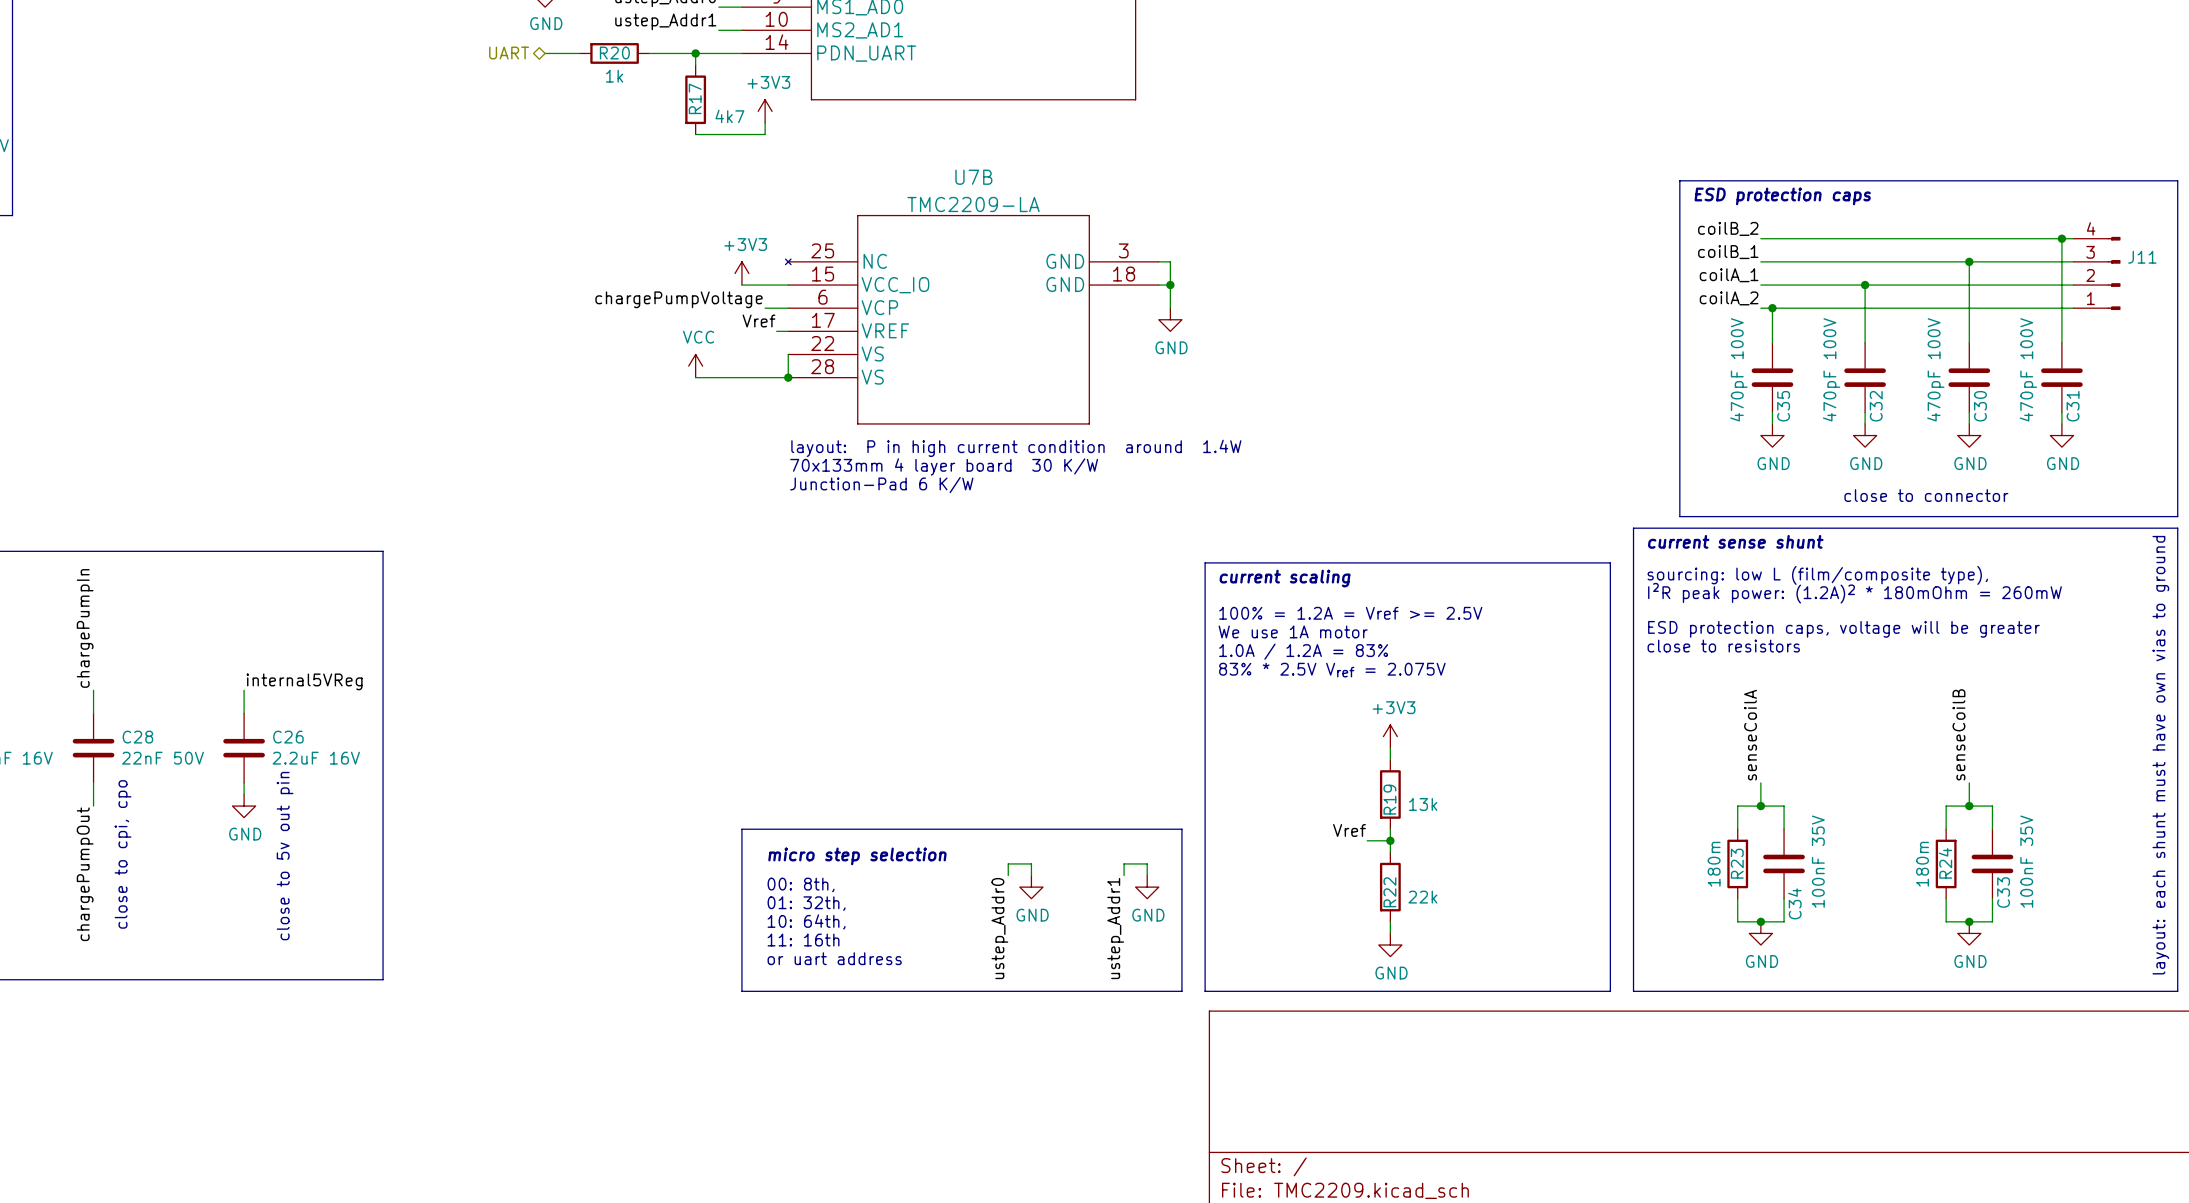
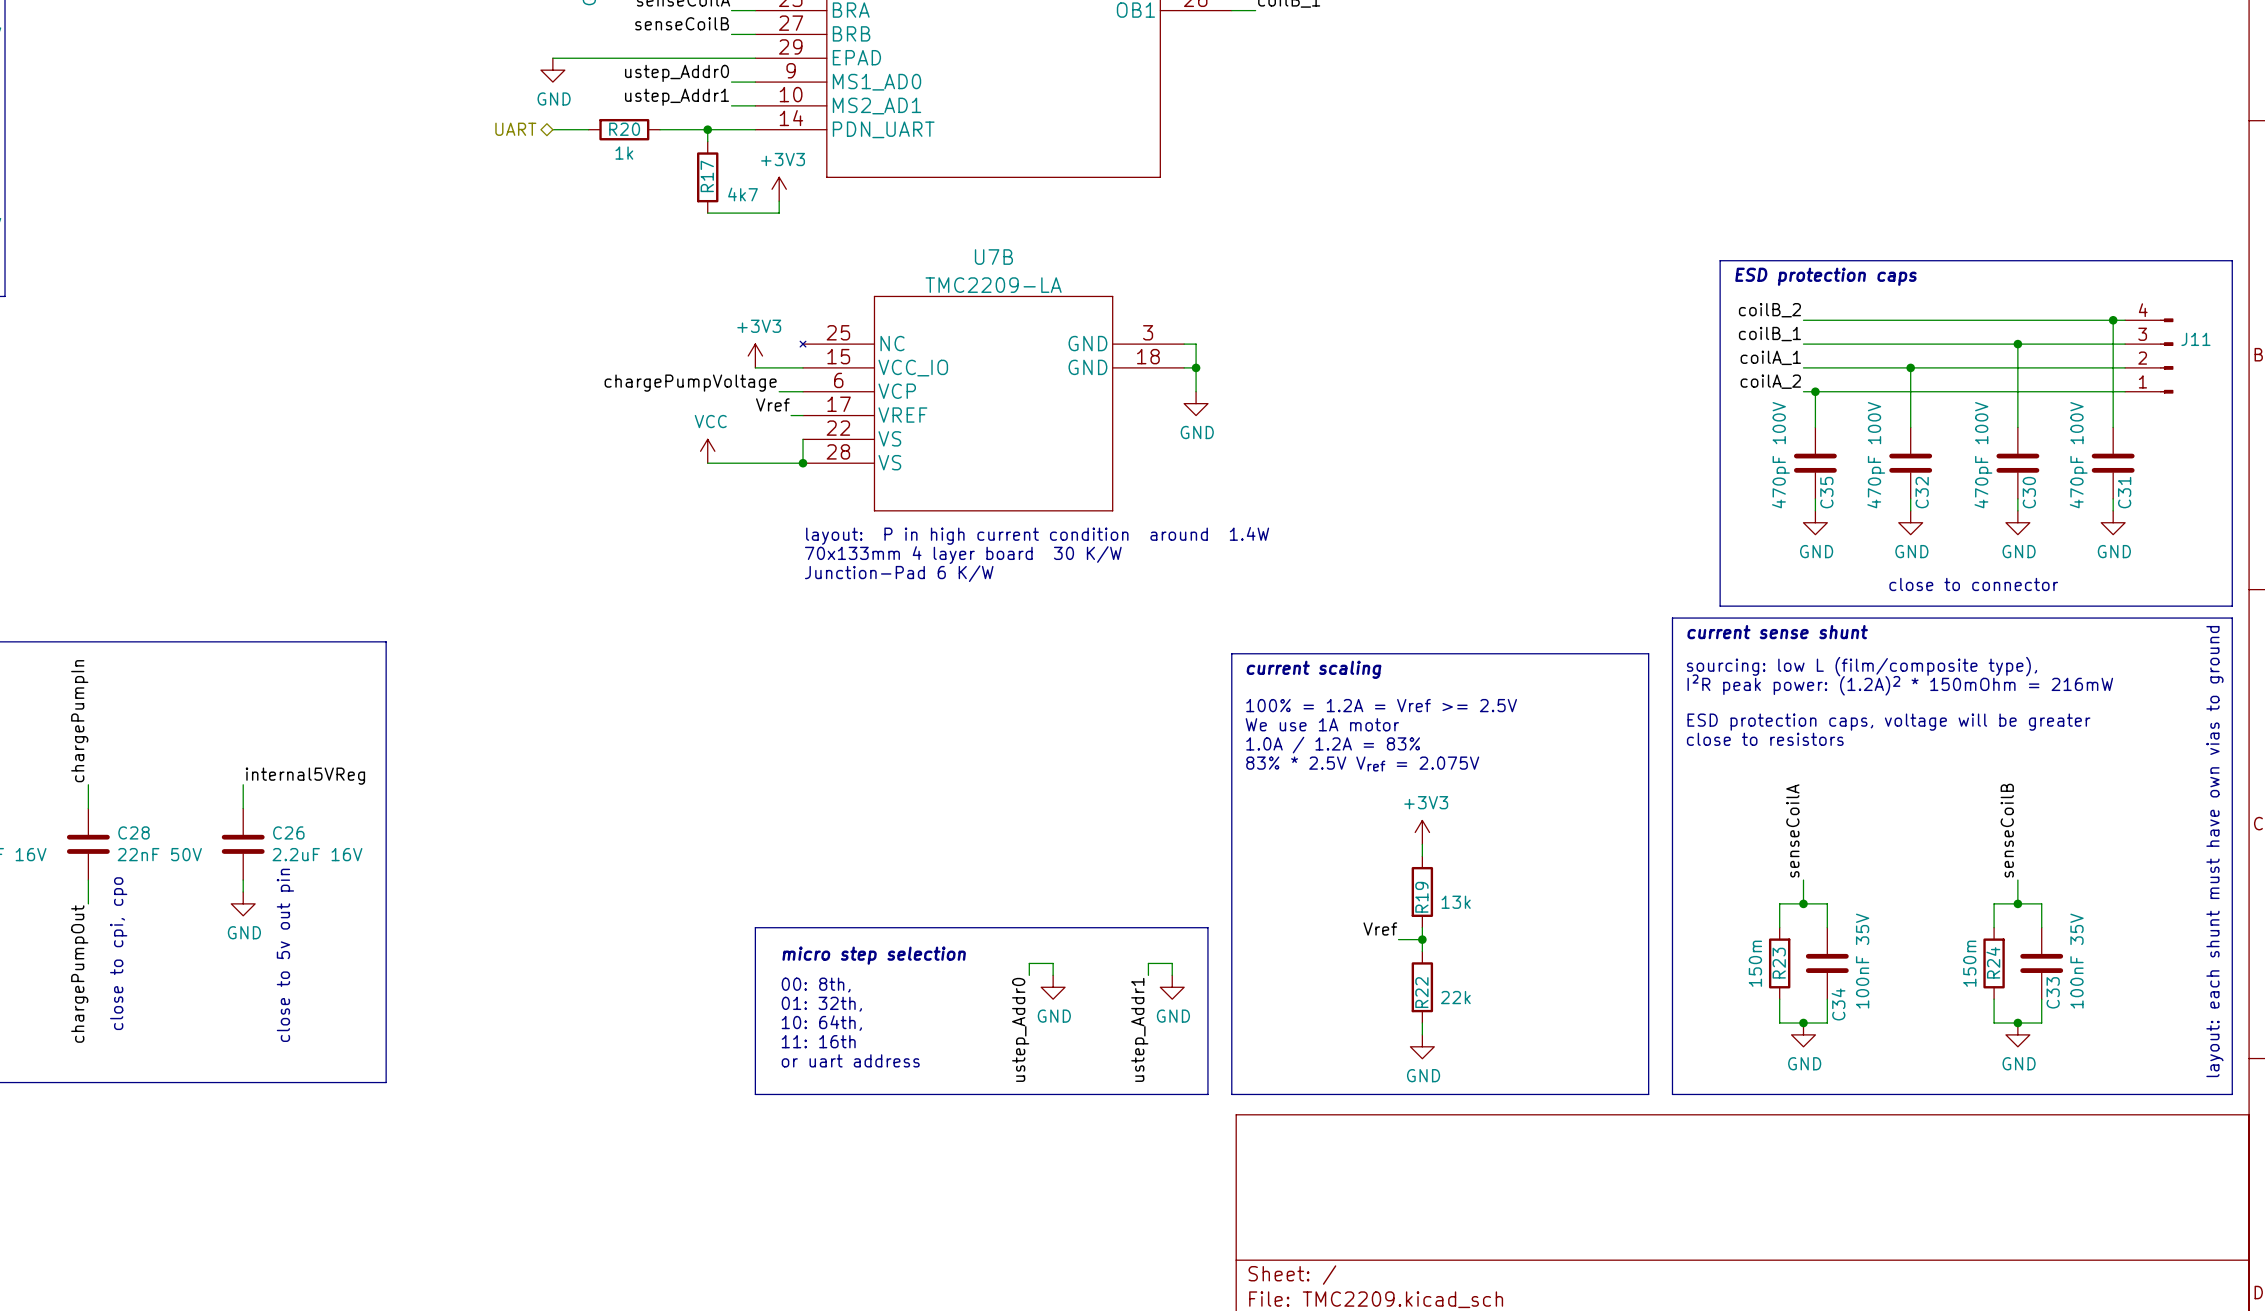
text: I²R peak power: (1.2A)2 * 180mOhm = 260mW (1854, 593) -> I²R peak power: (1.2A)2 * 150mOhm = 216mW (1900, 684)
R23 value: 180m (1714, 864) -> 150m (1755, 963)
R24 value: 180m (1922, 864) -> 150m (1969, 963)

